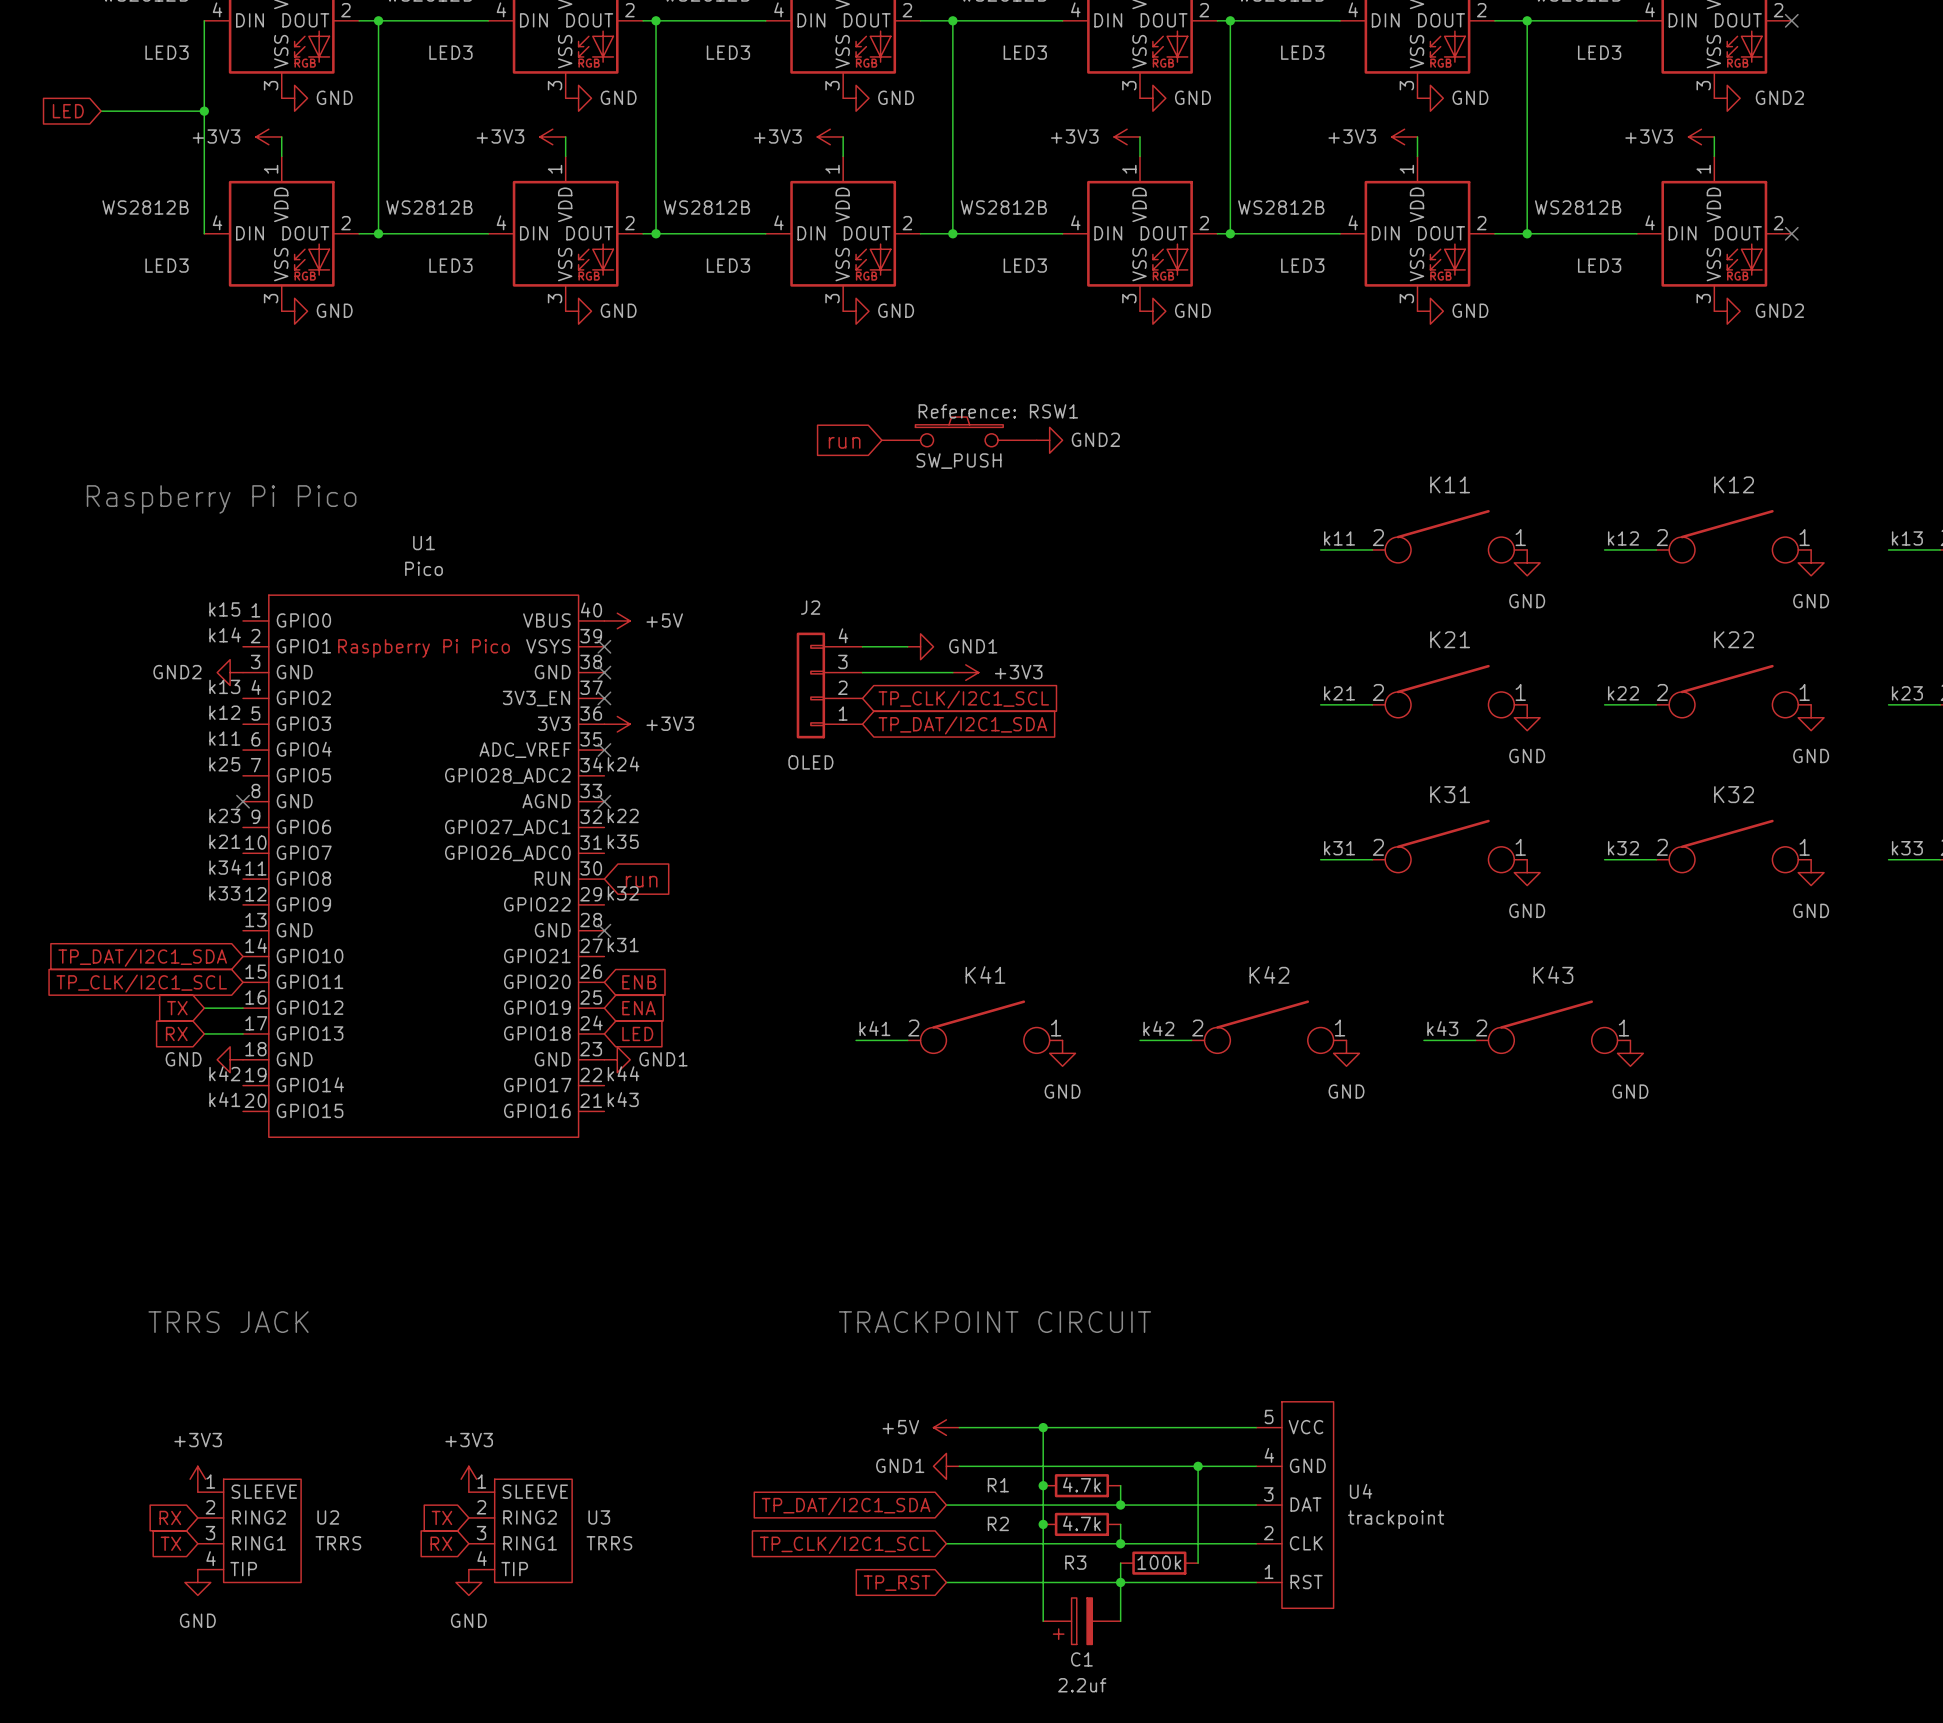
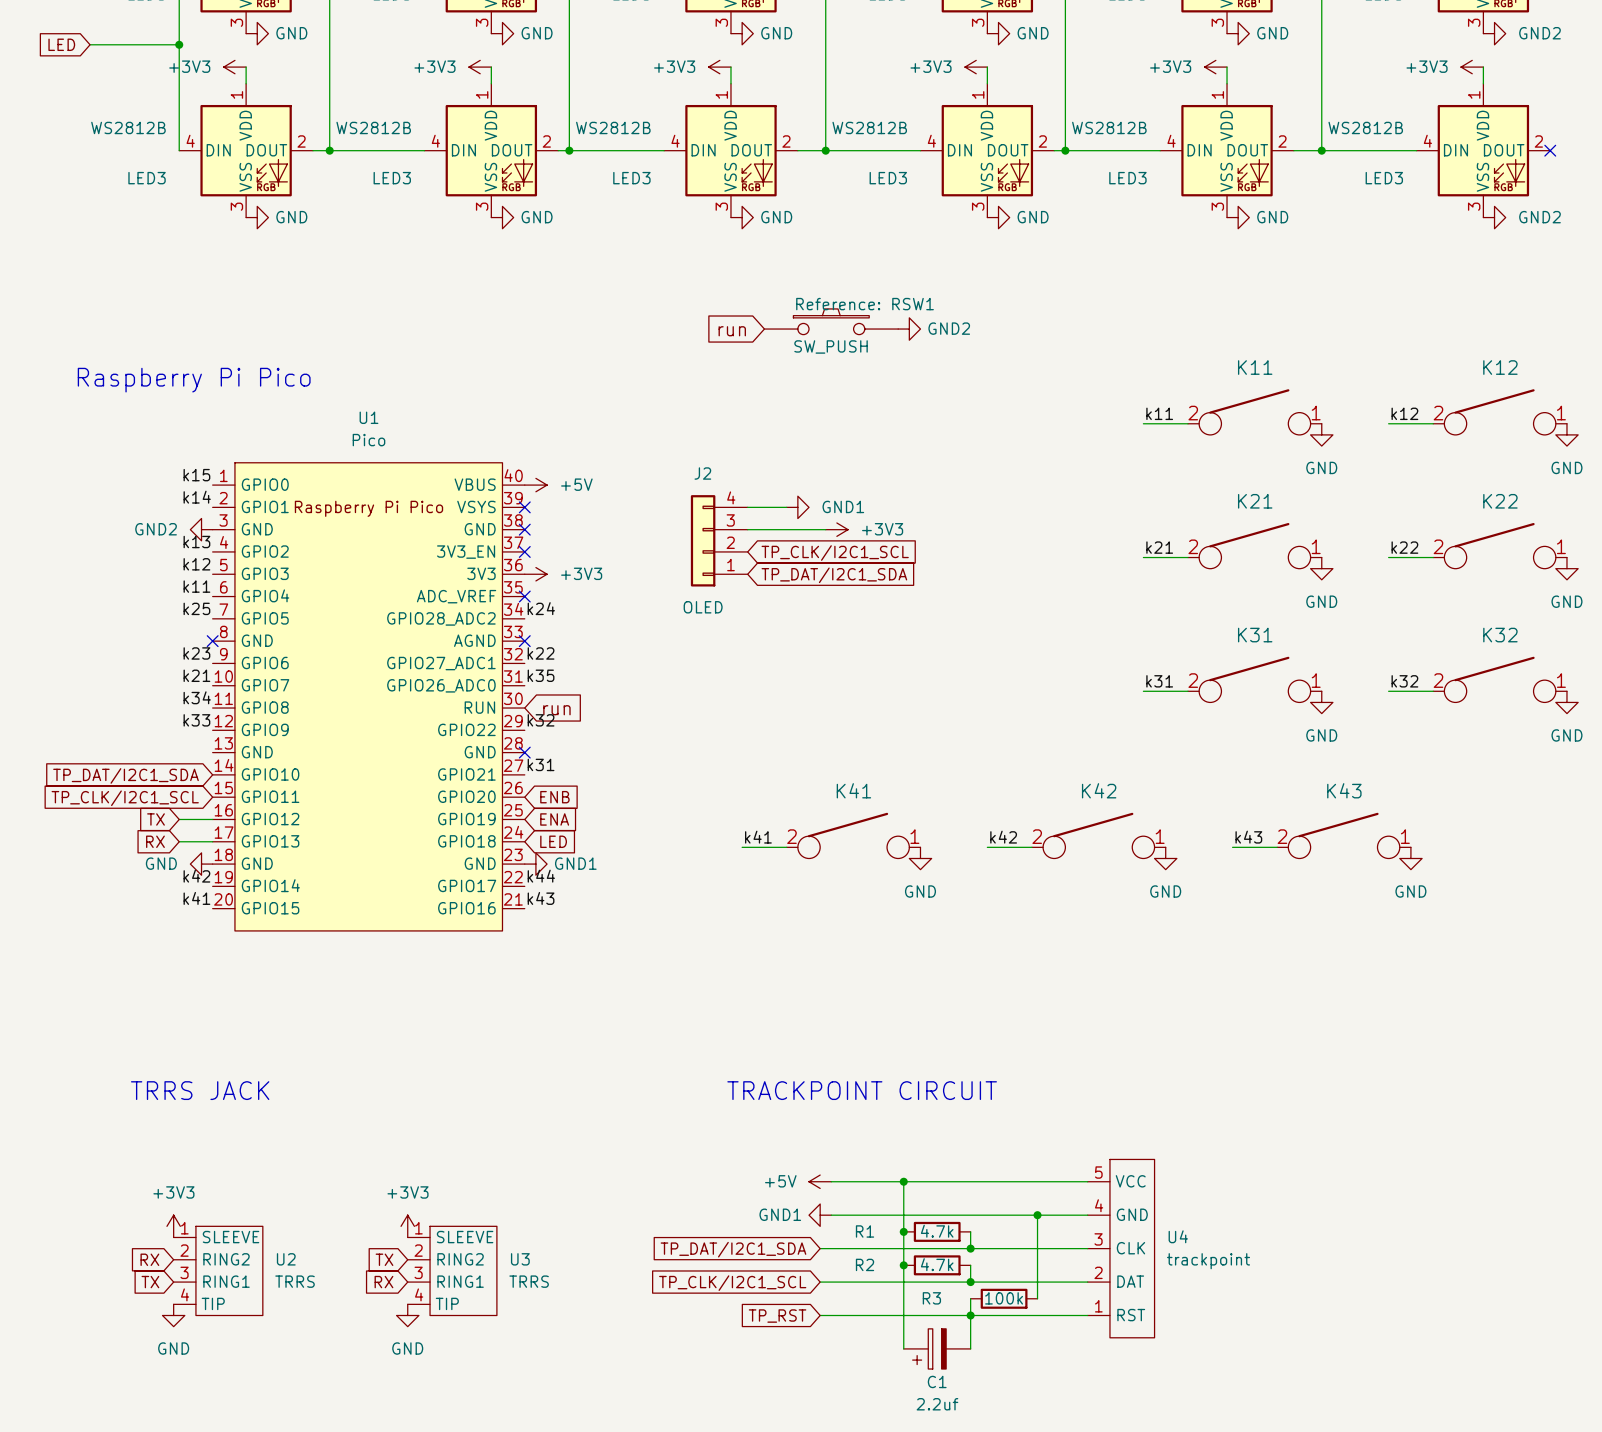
U4 pin name: DAT (1305, 1504) -> CLK (1130, 1248)
U4 pin name: CLK (1306, 1543) -> DAT (1130, 1281)

